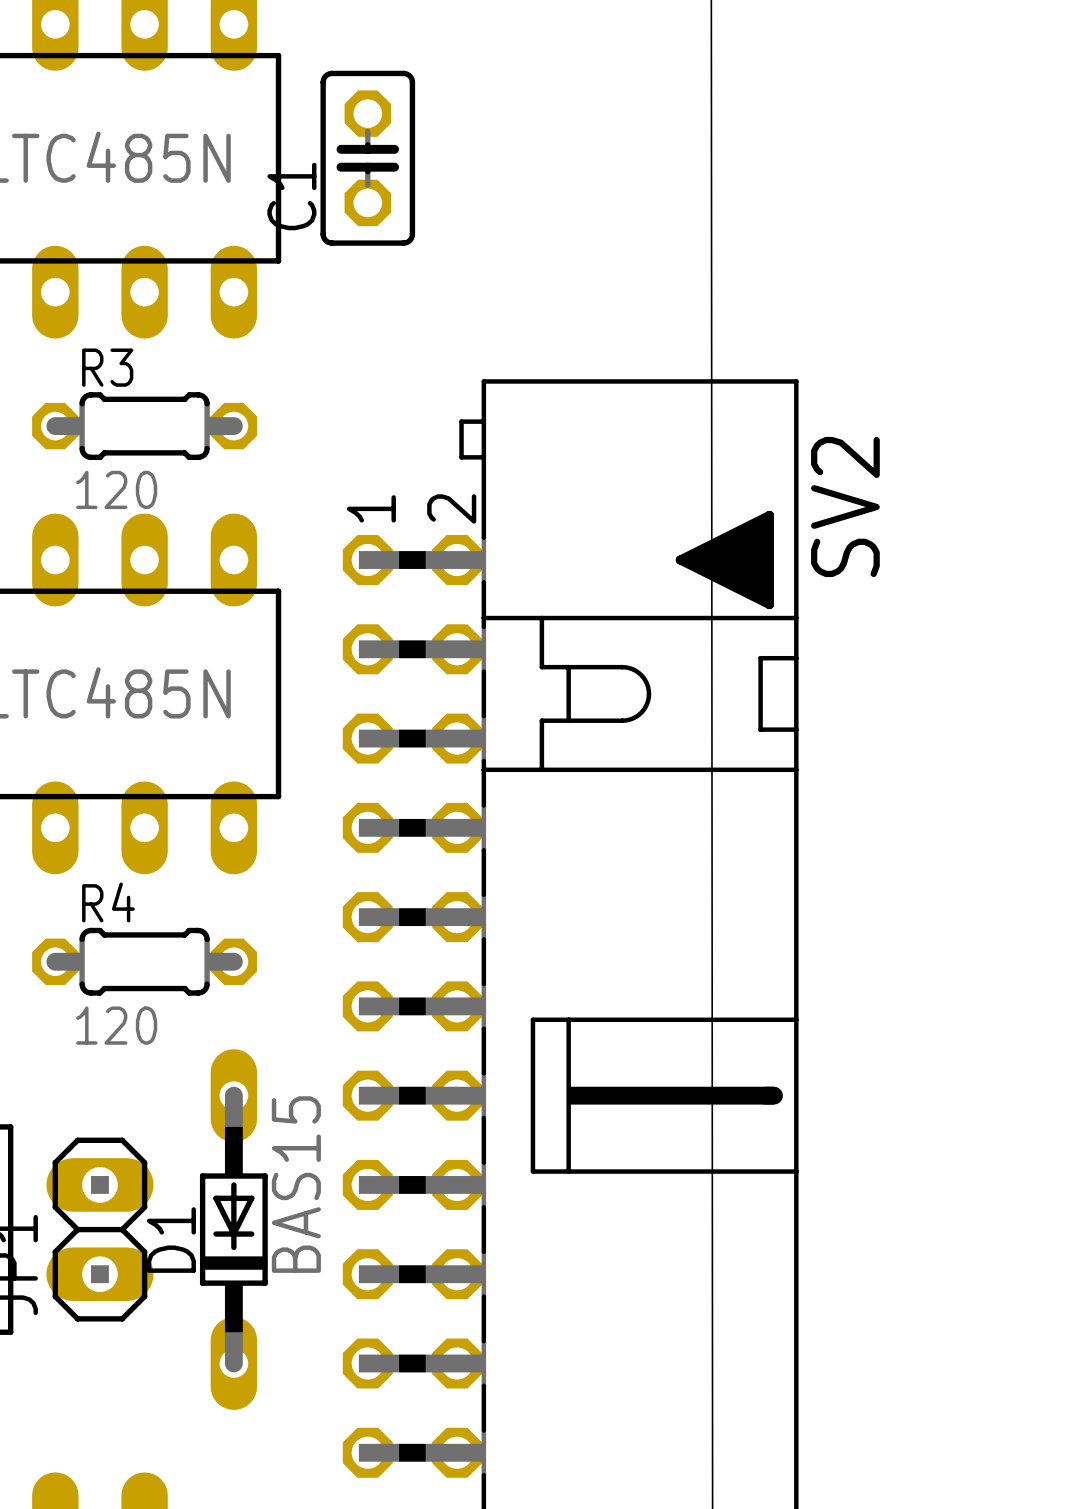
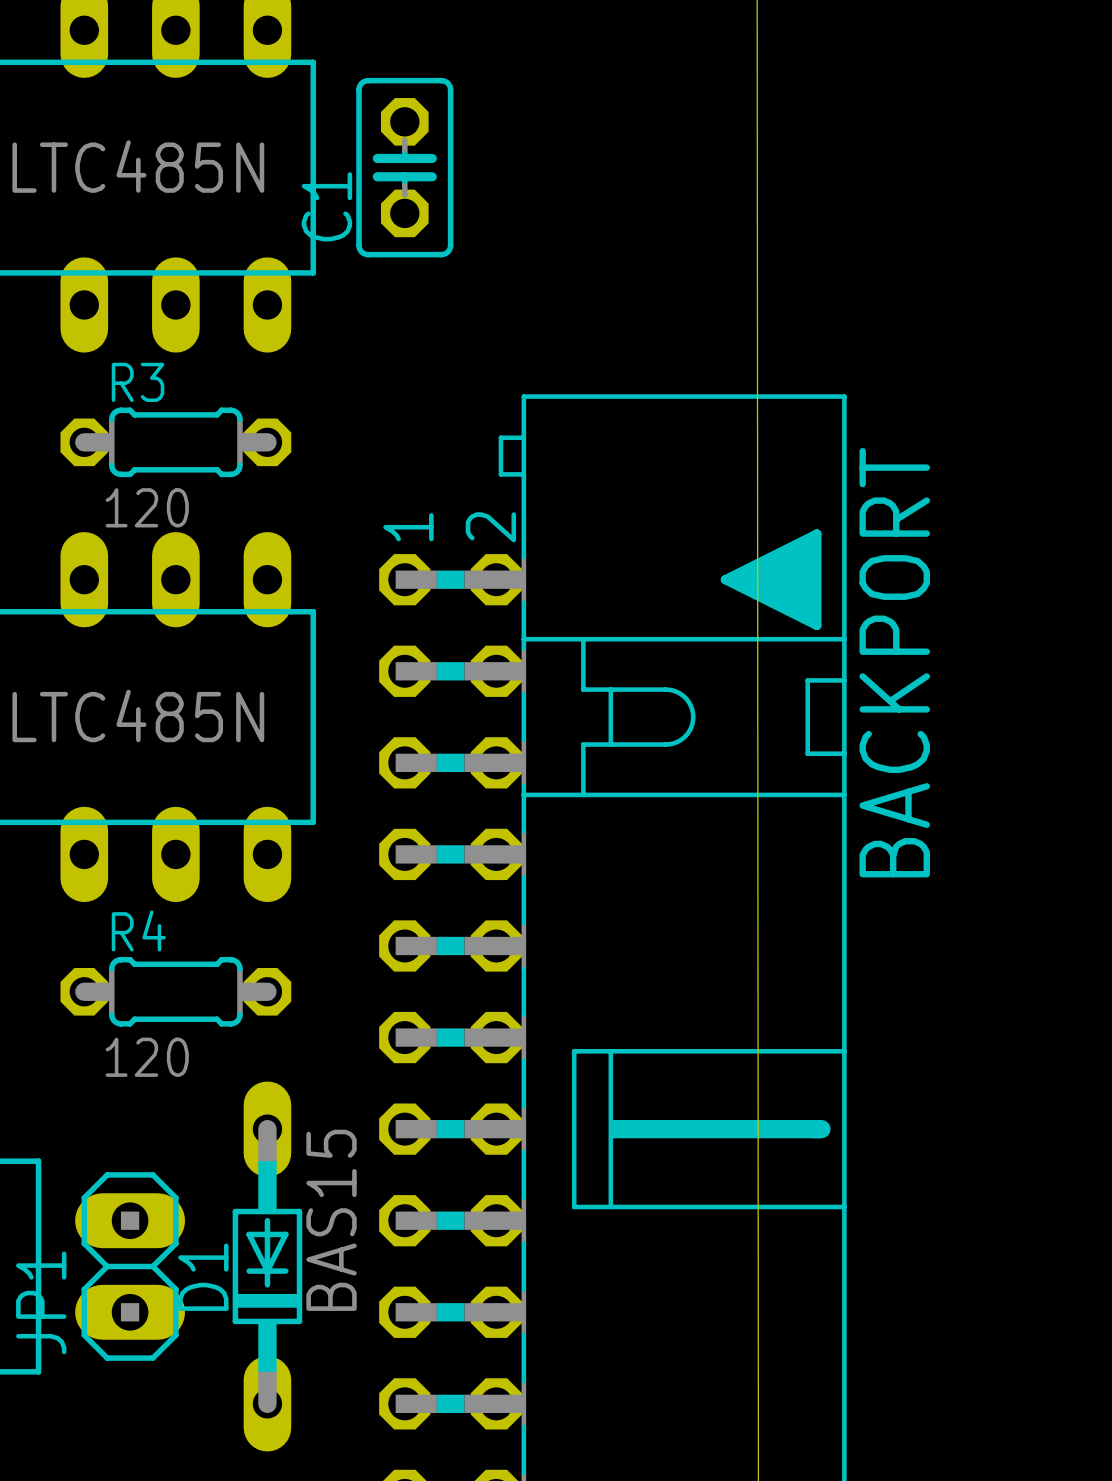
SV2 name: SV2 (845, 506) -> BACKPORT (894, 662)

